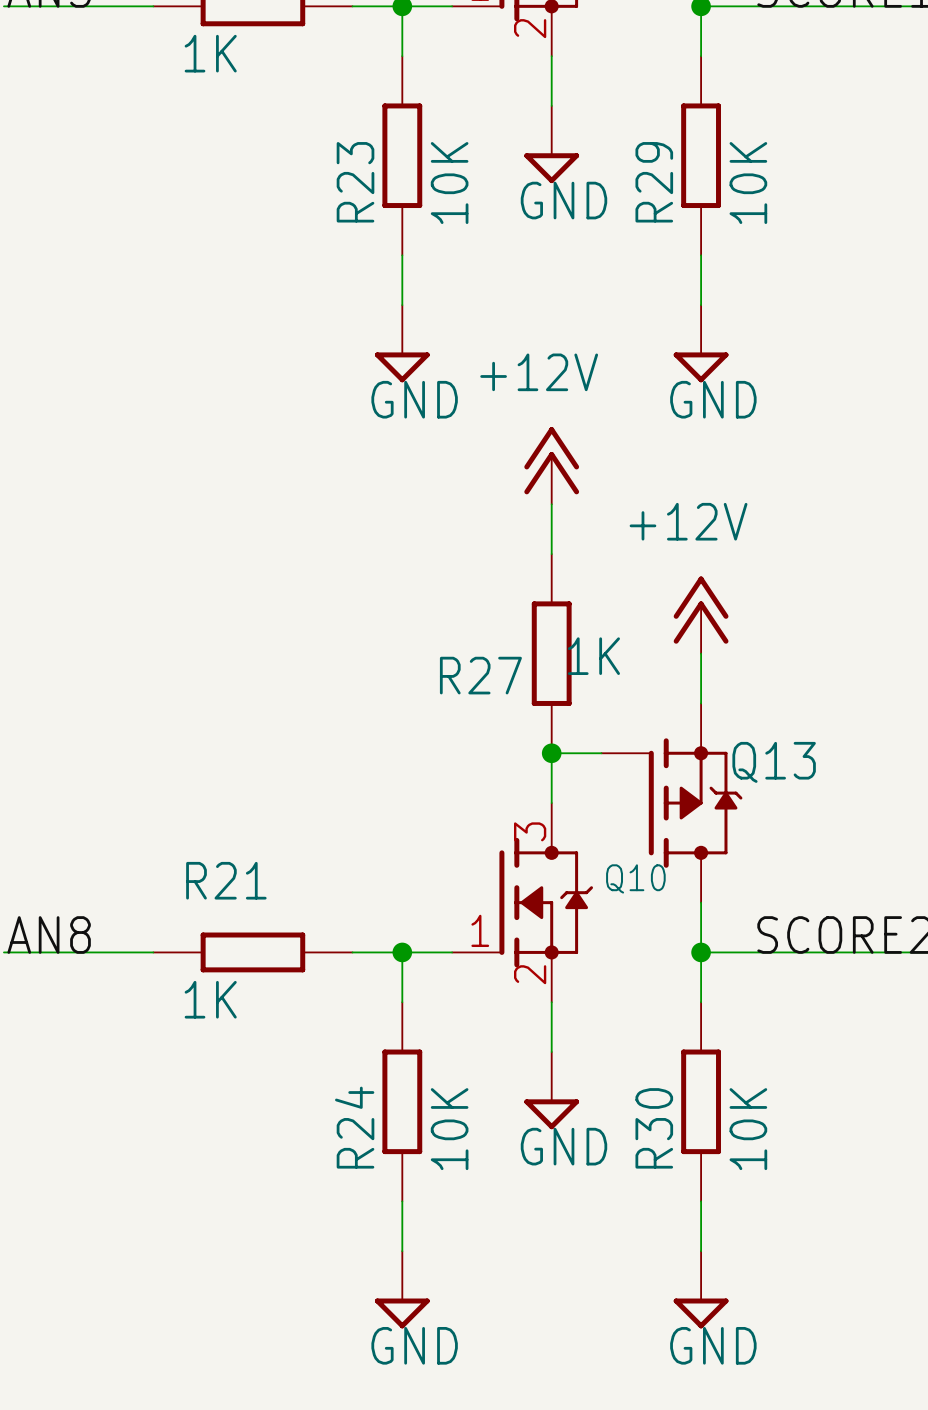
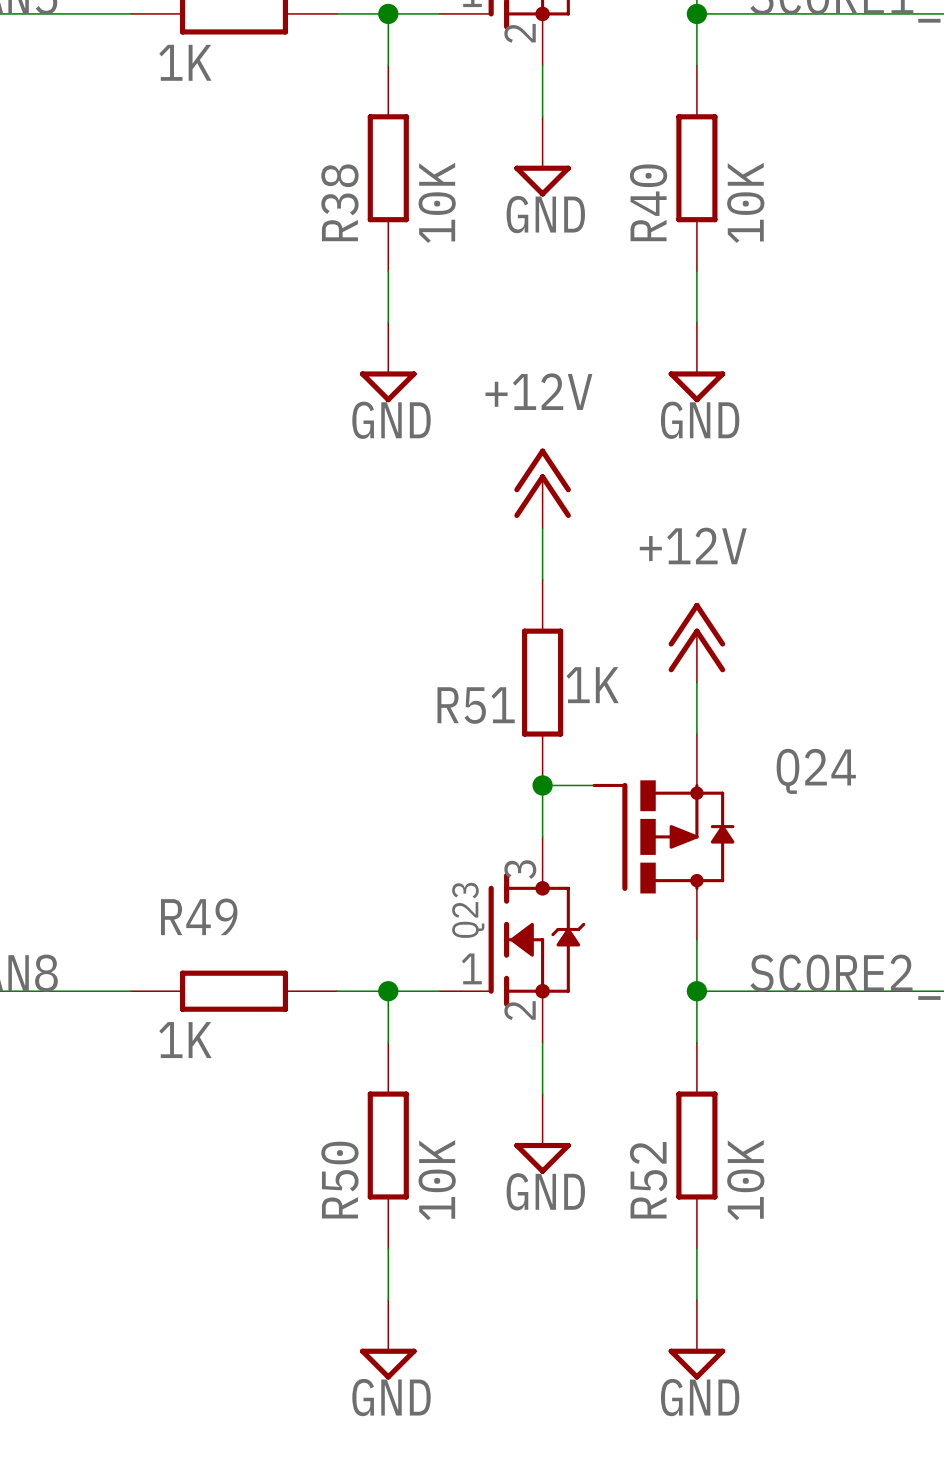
R23 name: R23 (355, 182) -> R38 (339, 202)
R29 name: R29 (654, 182) -> R40 (648, 202)
R27 name: R27 (480, 675) -> R51 (476, 705)
Q24: none -> (663, 836)
Q13: (671, 803) -> none
Q10 name: Q10 (635, 878) -> Q23 (468, 910)
R21 name: R21 (226, 880) -> R49 (199, 916)
R24 name: R24 (354, 1127) -> R50 (339, 1180)
R30 name: R30 (654, 1128) -> R52 (648, 1180)

